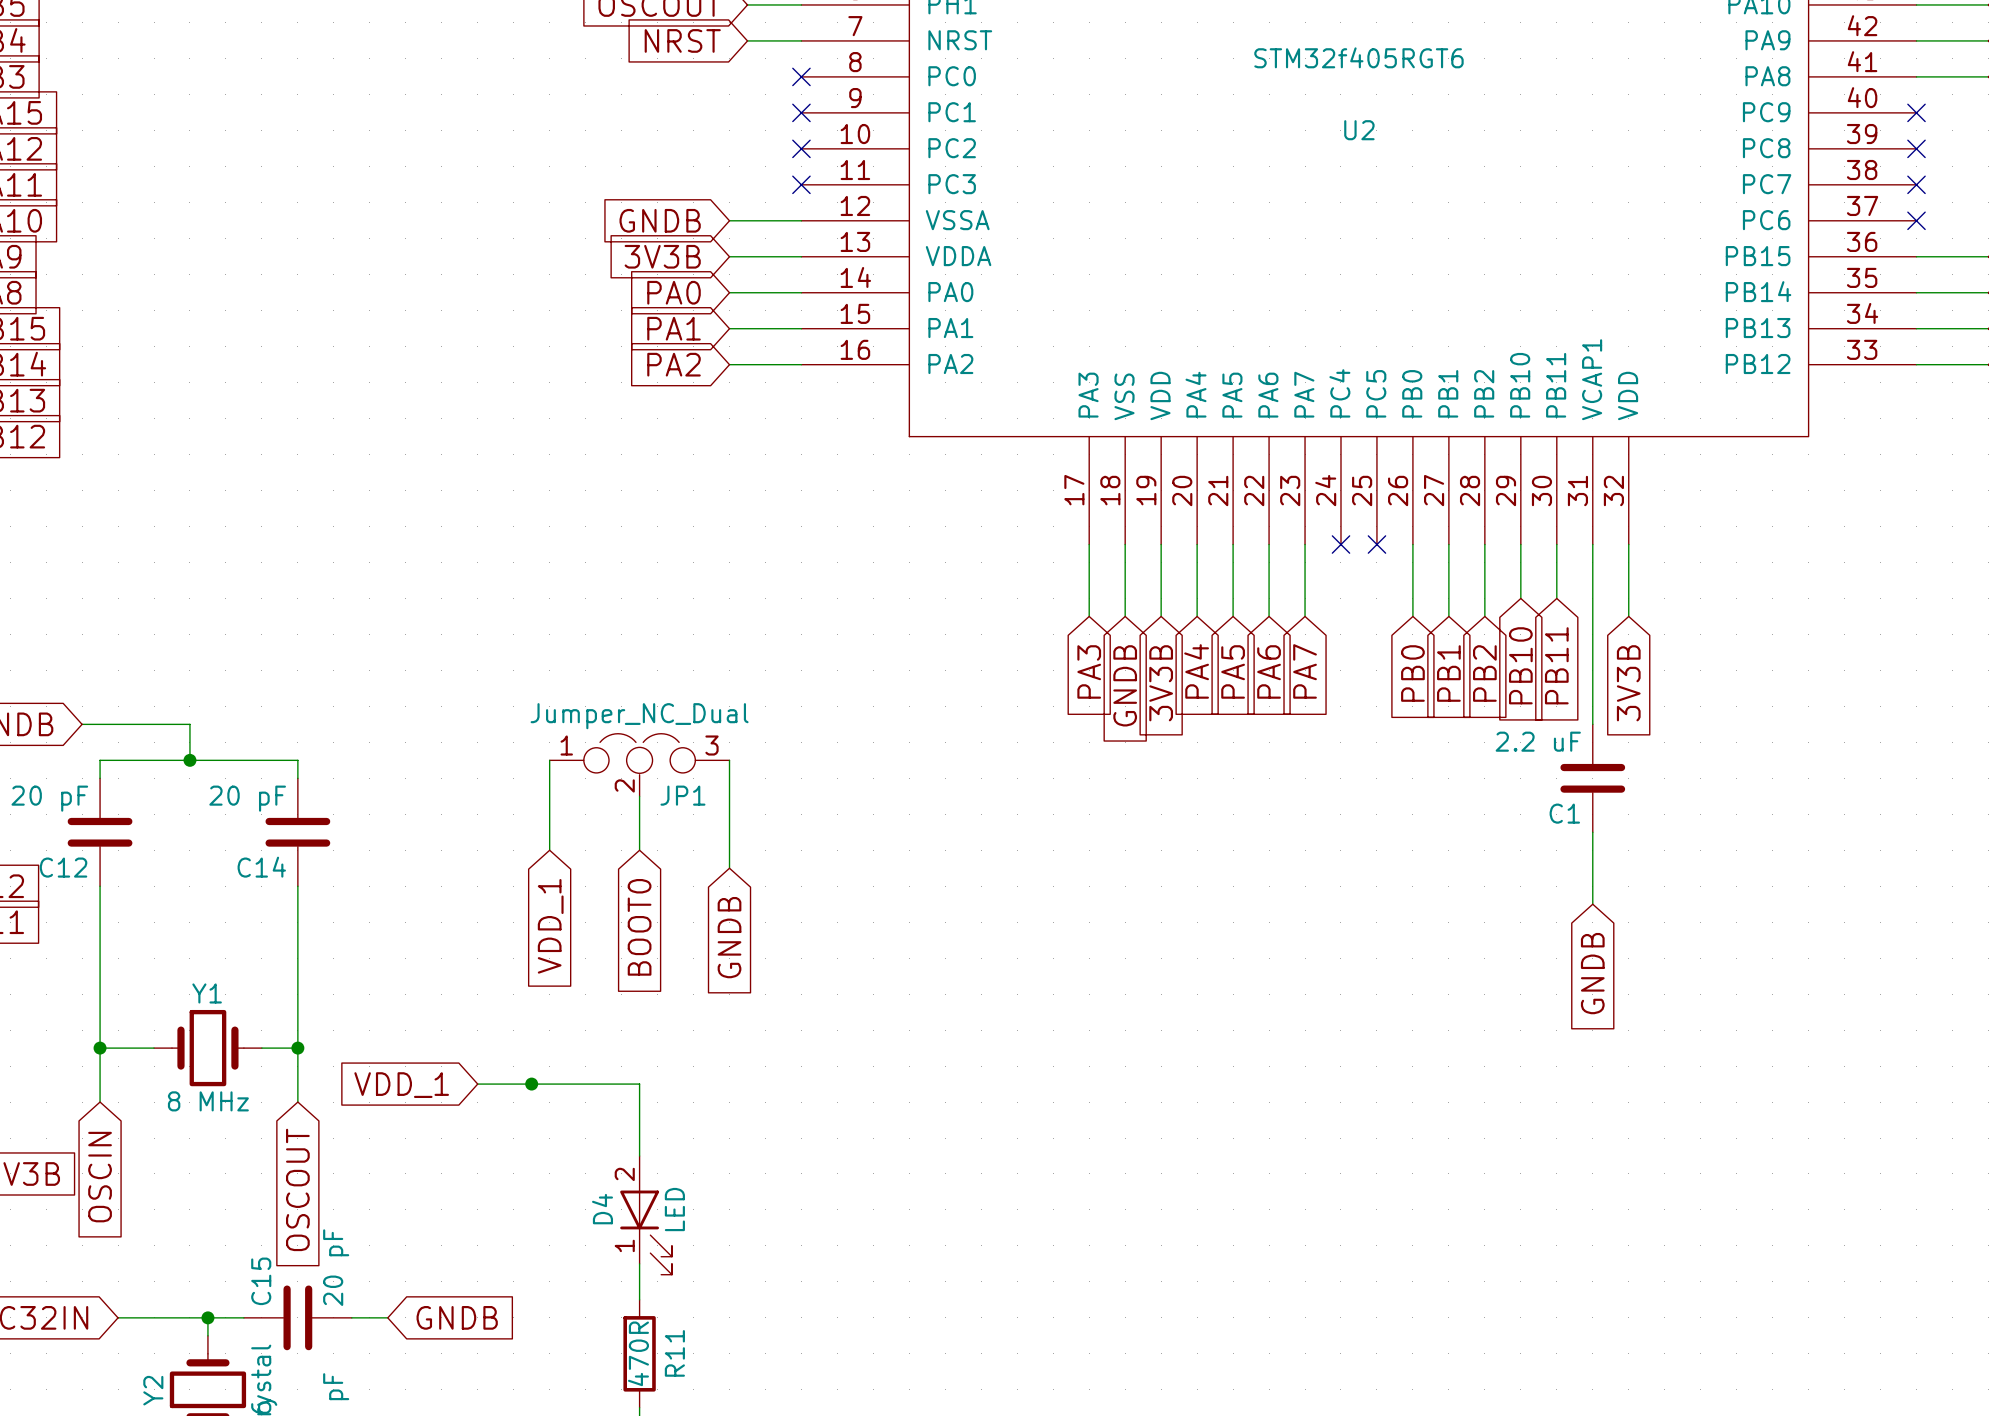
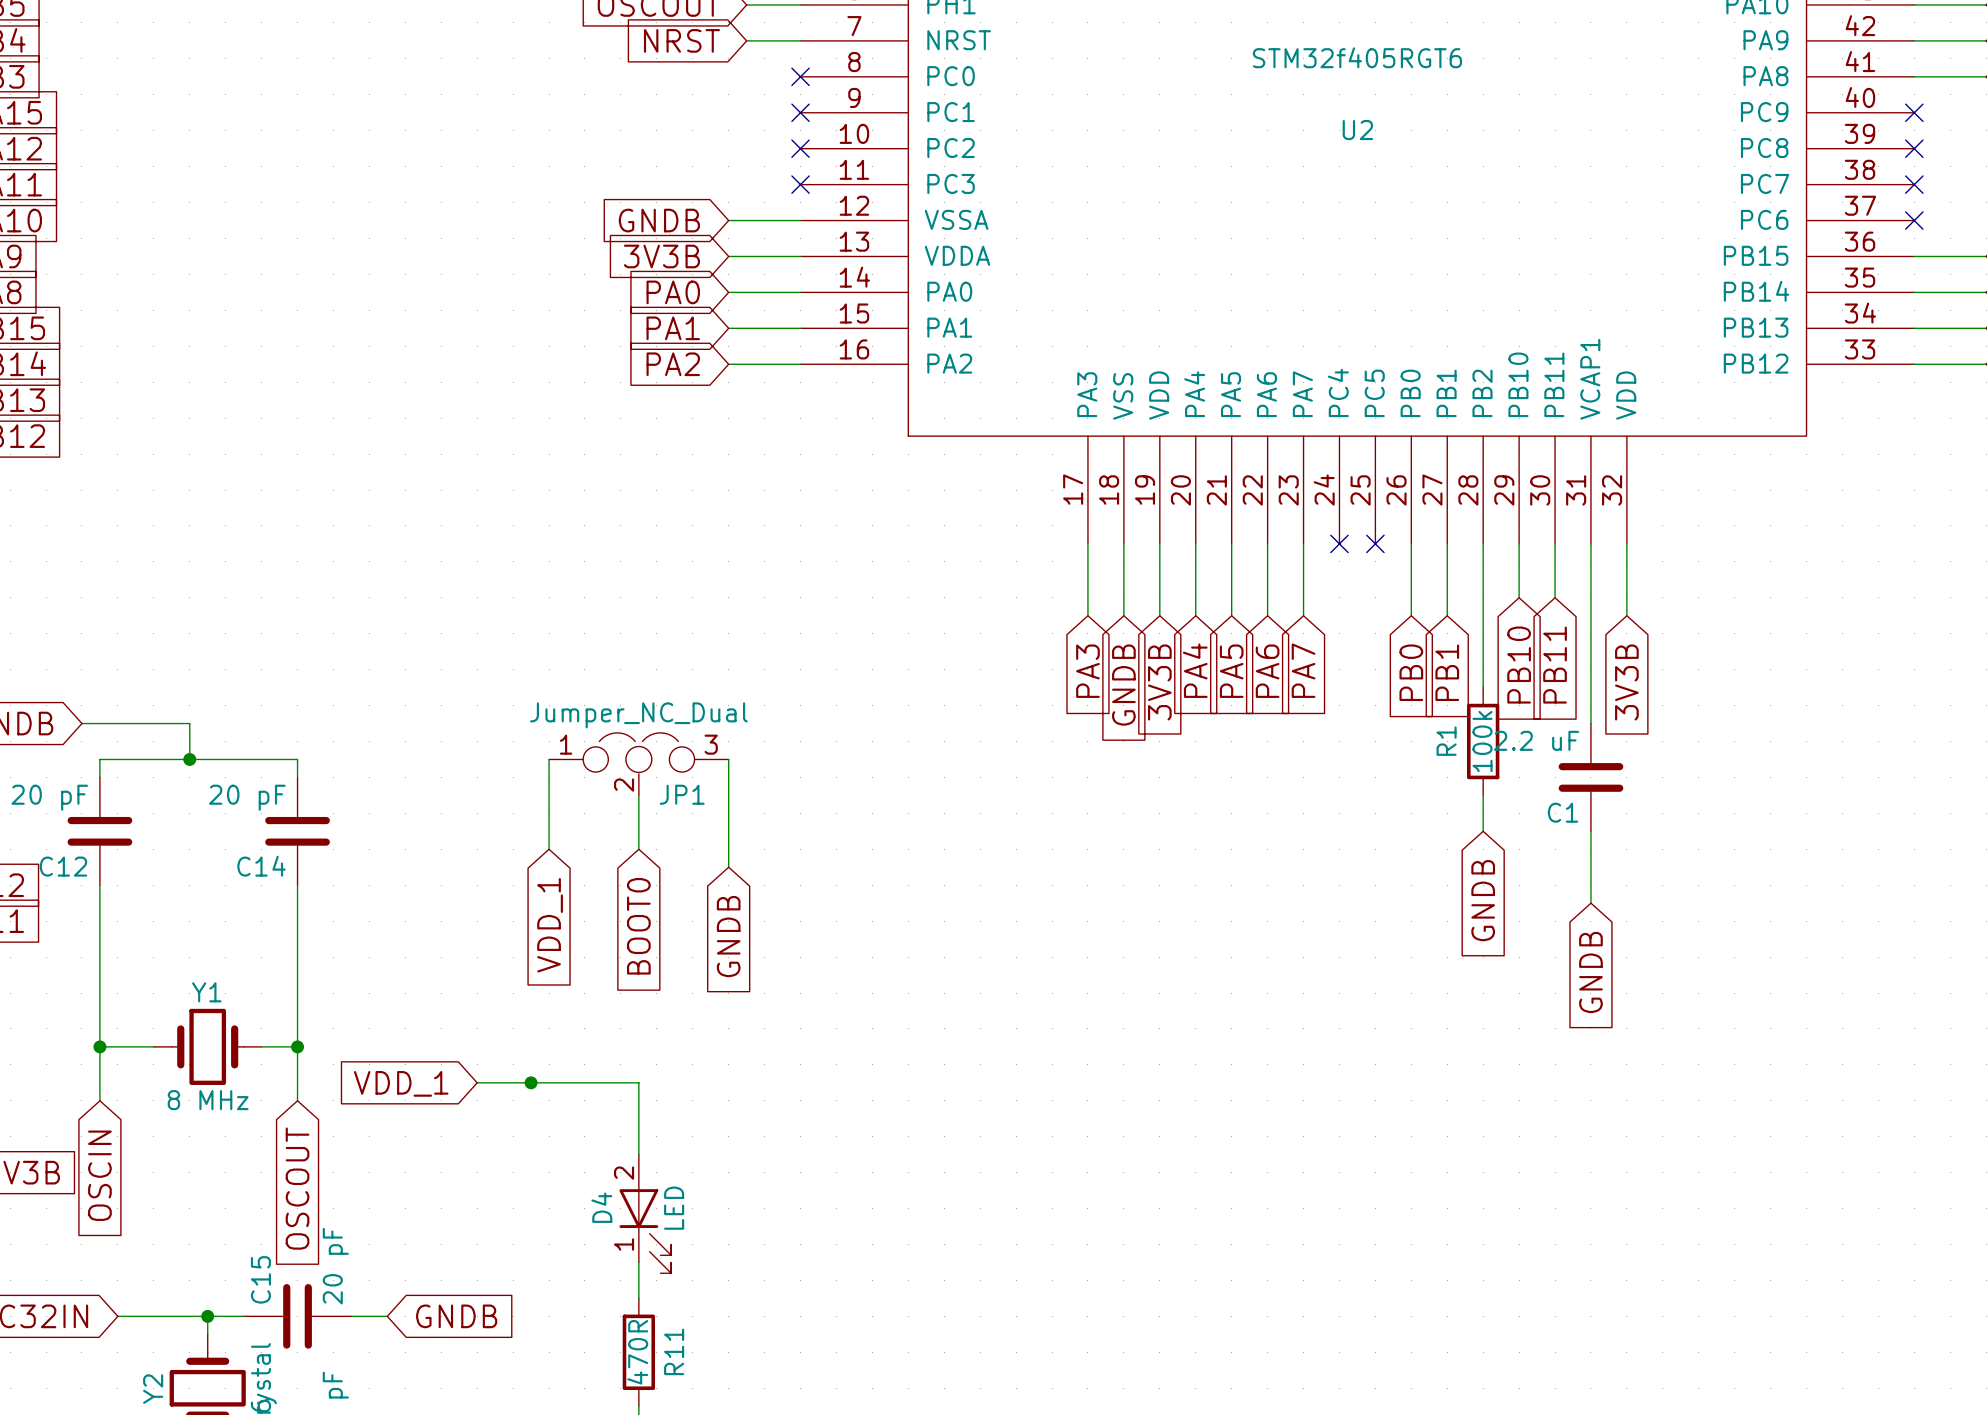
wire: none -> (1483, 615) (1483, 687)
global label: PB2 (1484, 673) -> none
R1: none -> 100k (1483, 741)
wire: none -> (1483, 795) (1483, 831)
global label: none -> GNDB (1483, 900)

